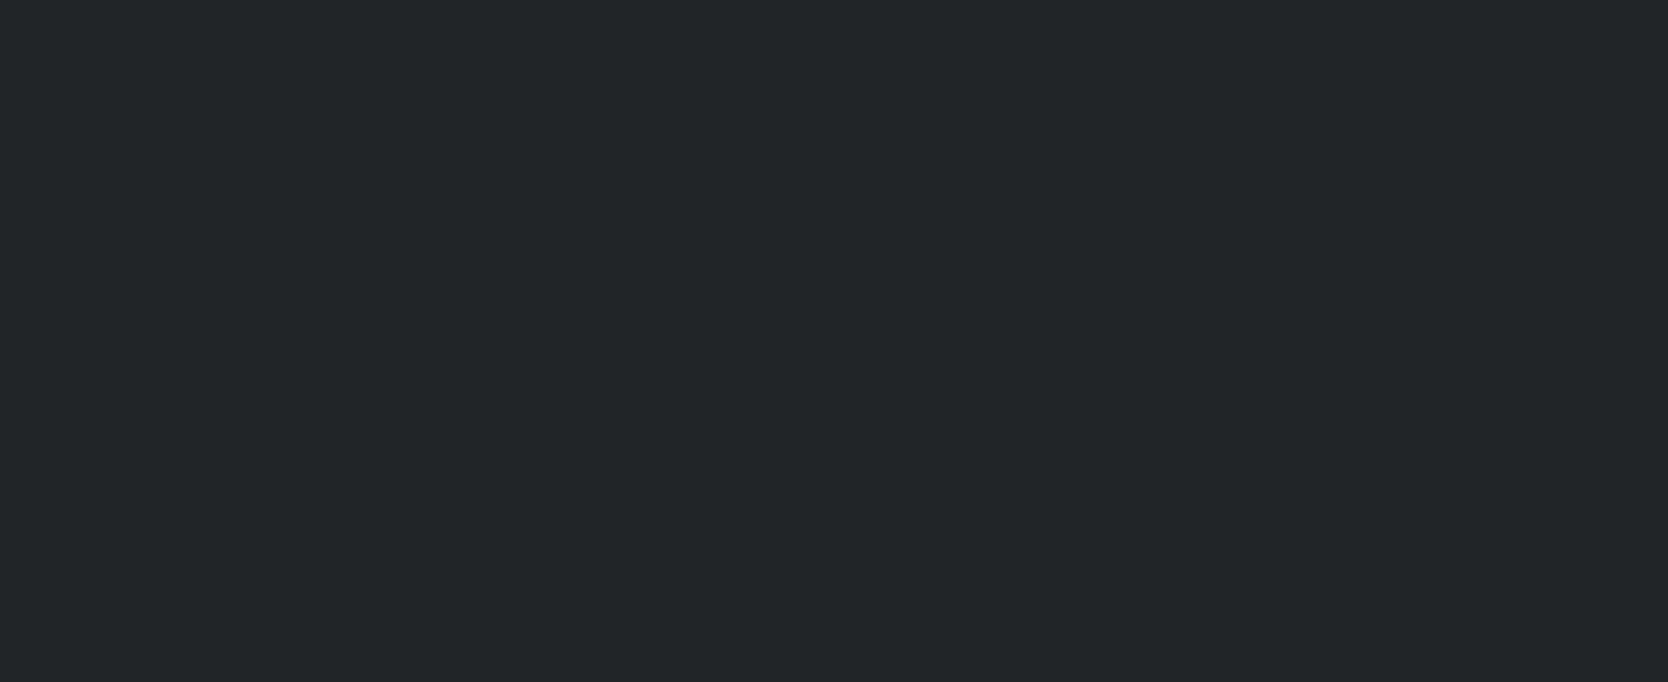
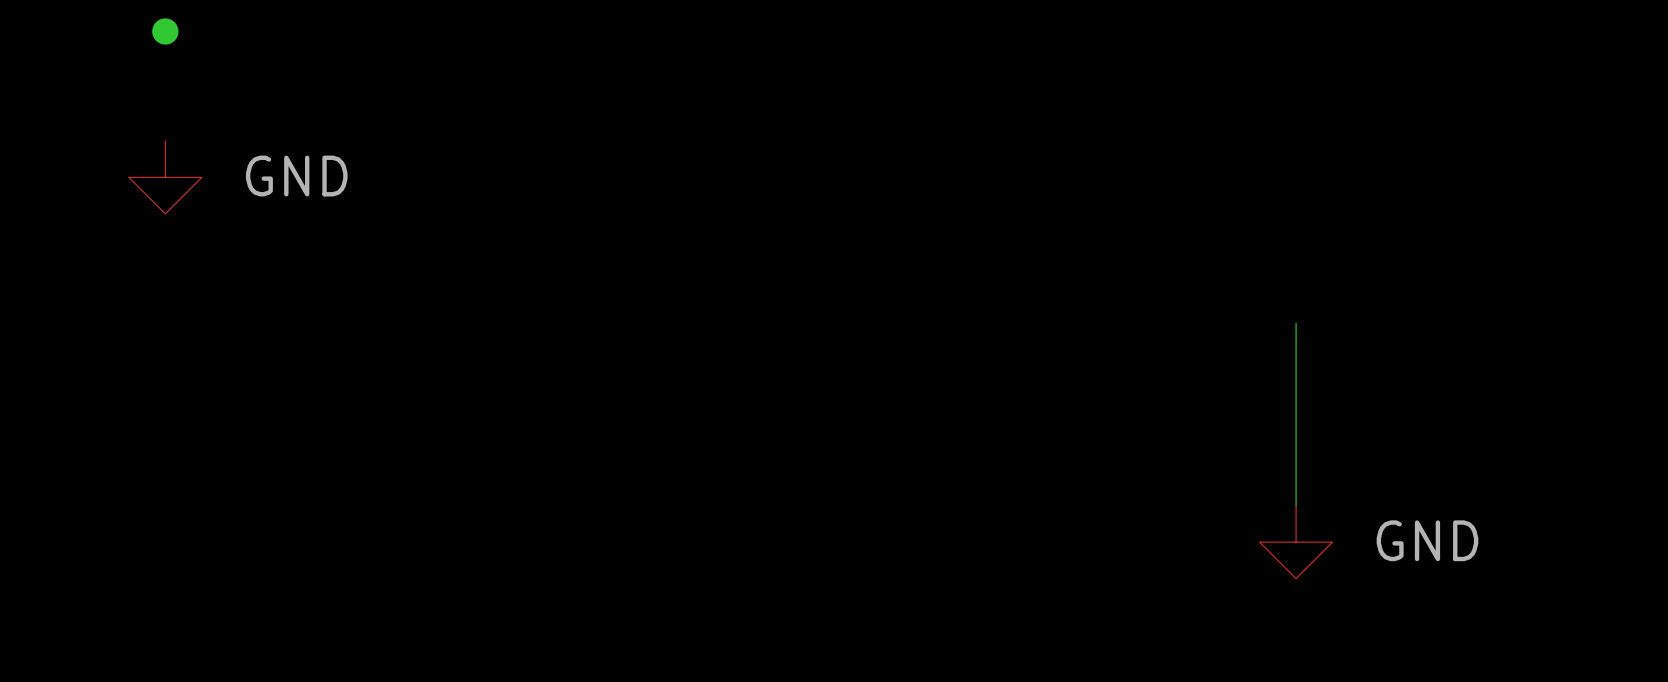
junction: none -> (165, 31)
power symbol: none -> GND (165, 177)
wire: none -> (1296, 323) (1296, 505)
power symbol: none -> GND (1296, 542)

